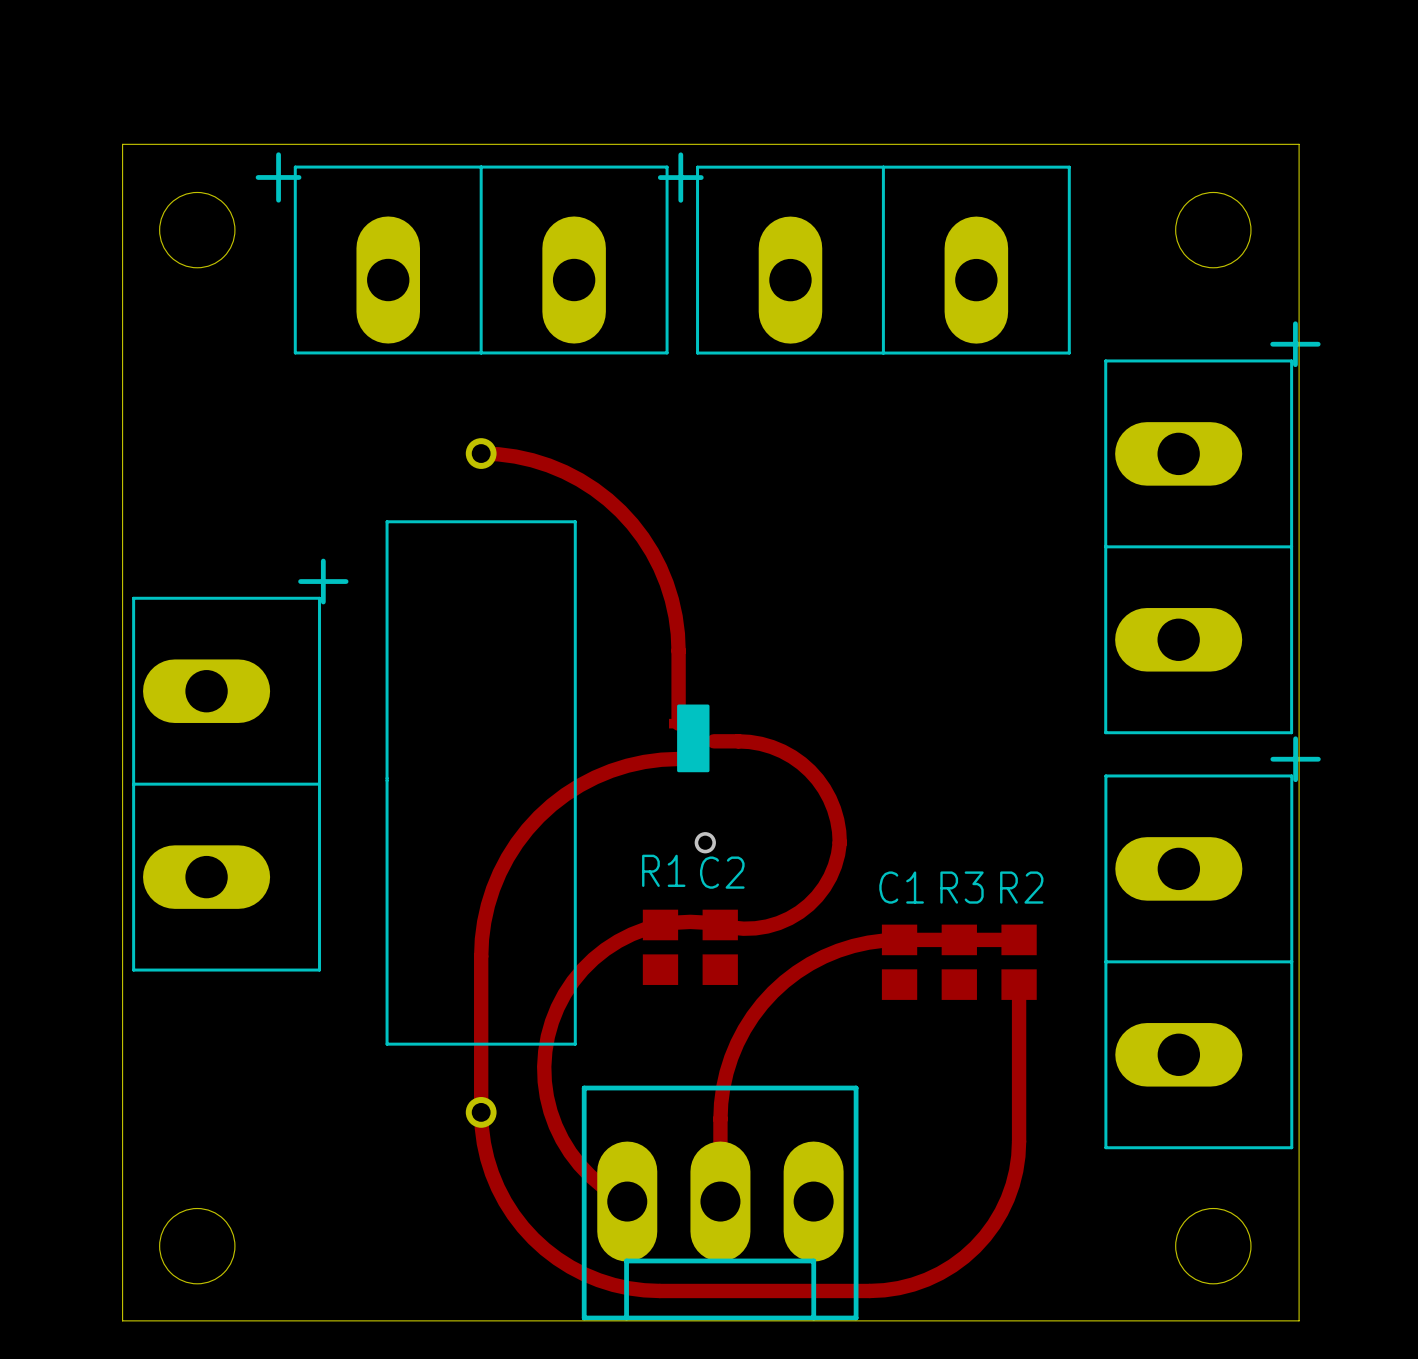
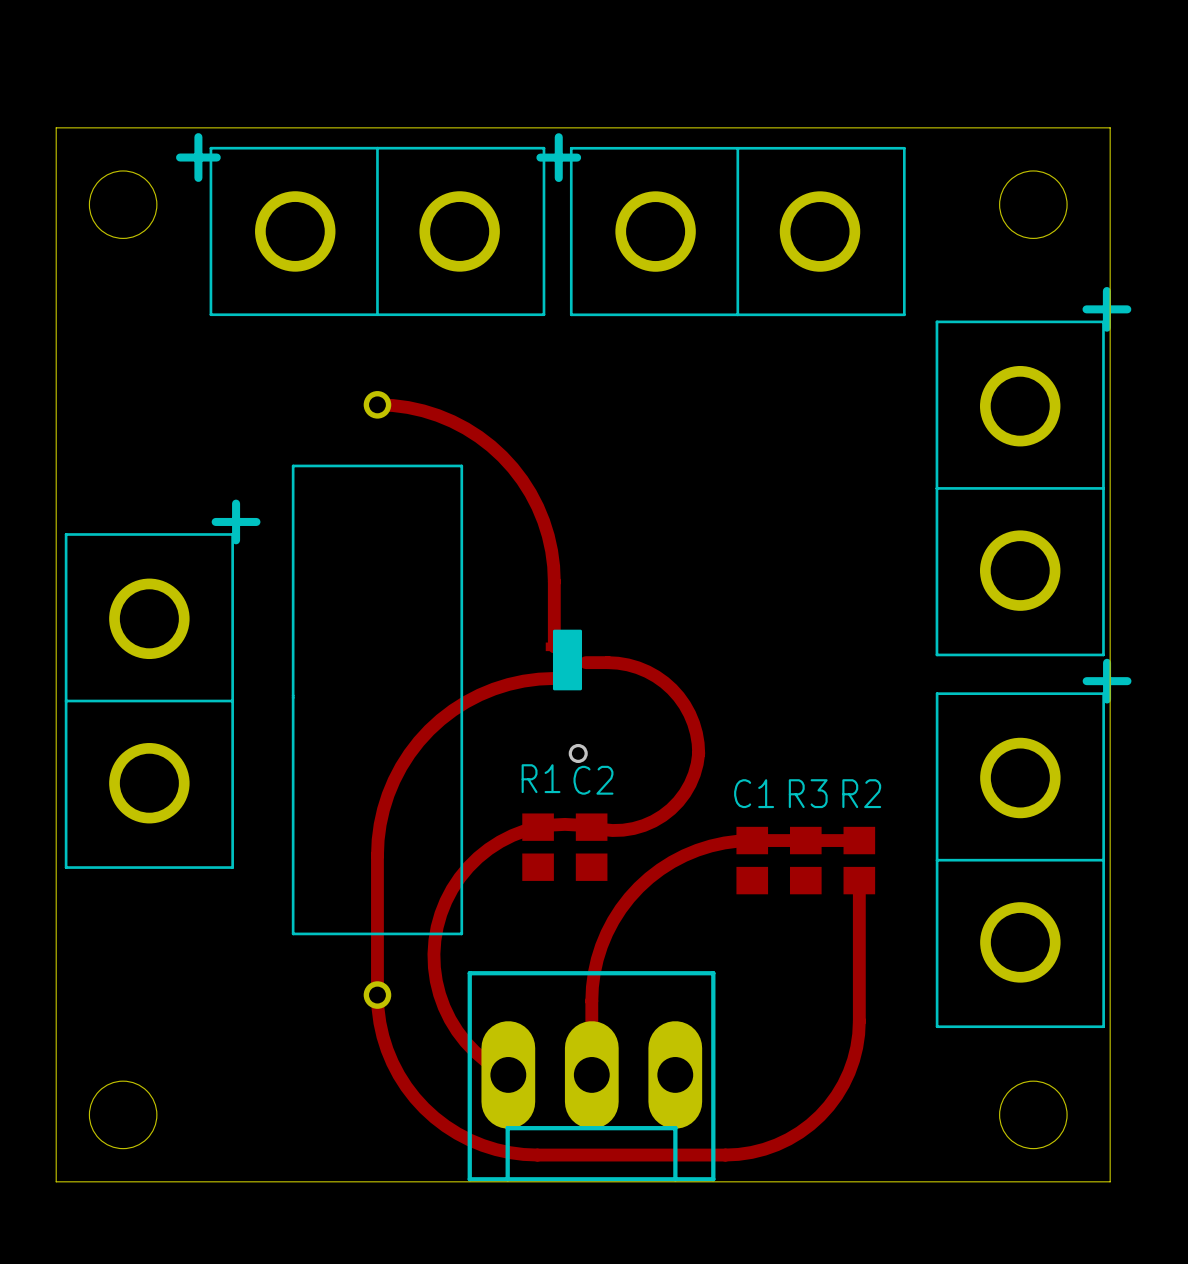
part footprint: [293, 165, 669, 355] -> [209, 146, 546, 317]
part footprint: [696, 165, 1071, 355] -> [569, 146, 906, 317]
part footprint: [1104, 359, 1294, 735] -> [935, 320, 1105, 657]
part footprint: [132, 596, 322, 972] -> [64, 533, 234, 869]
part footprint: [1104, 774, 1294, 1150] -> [935, 692, 1105, 1029]

